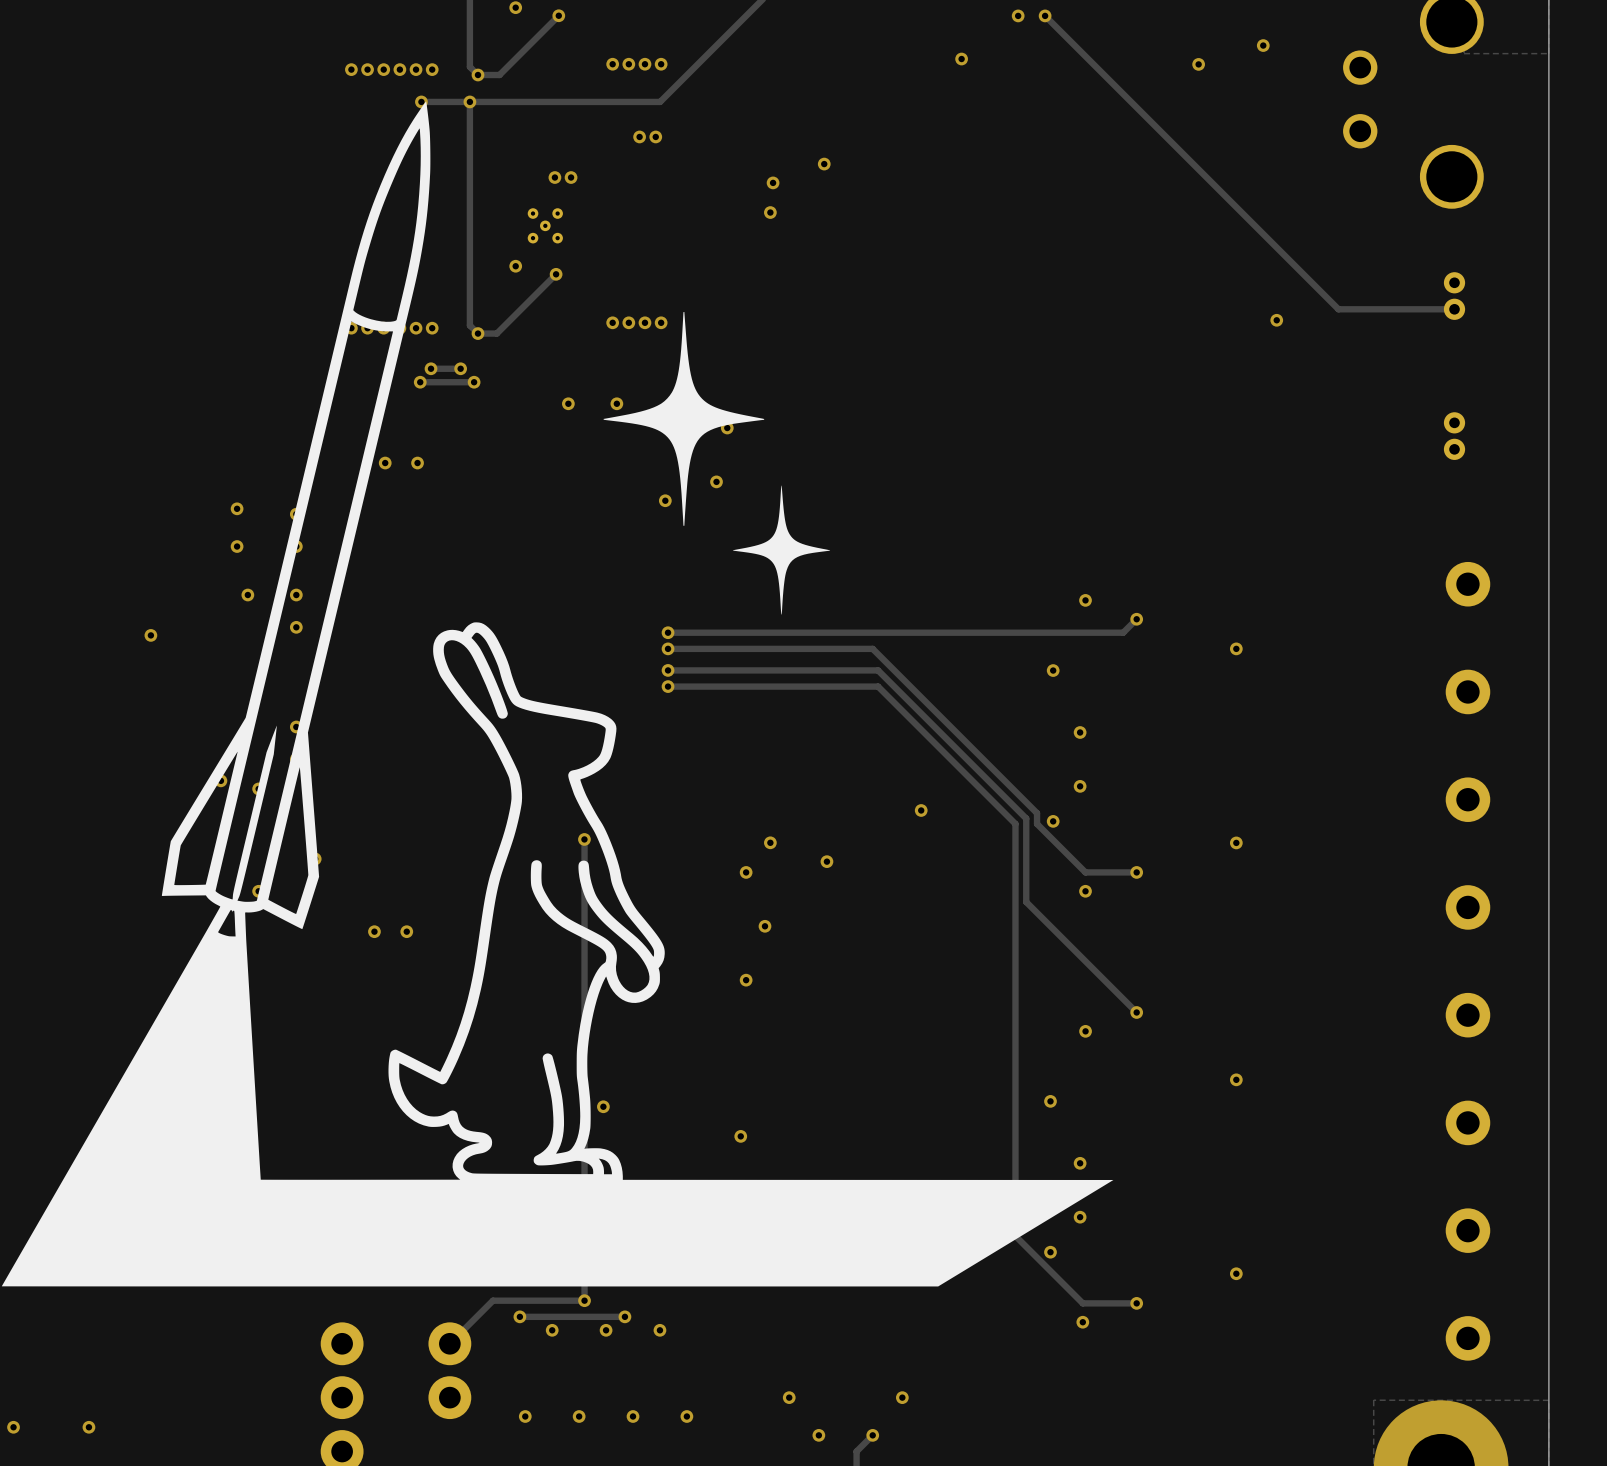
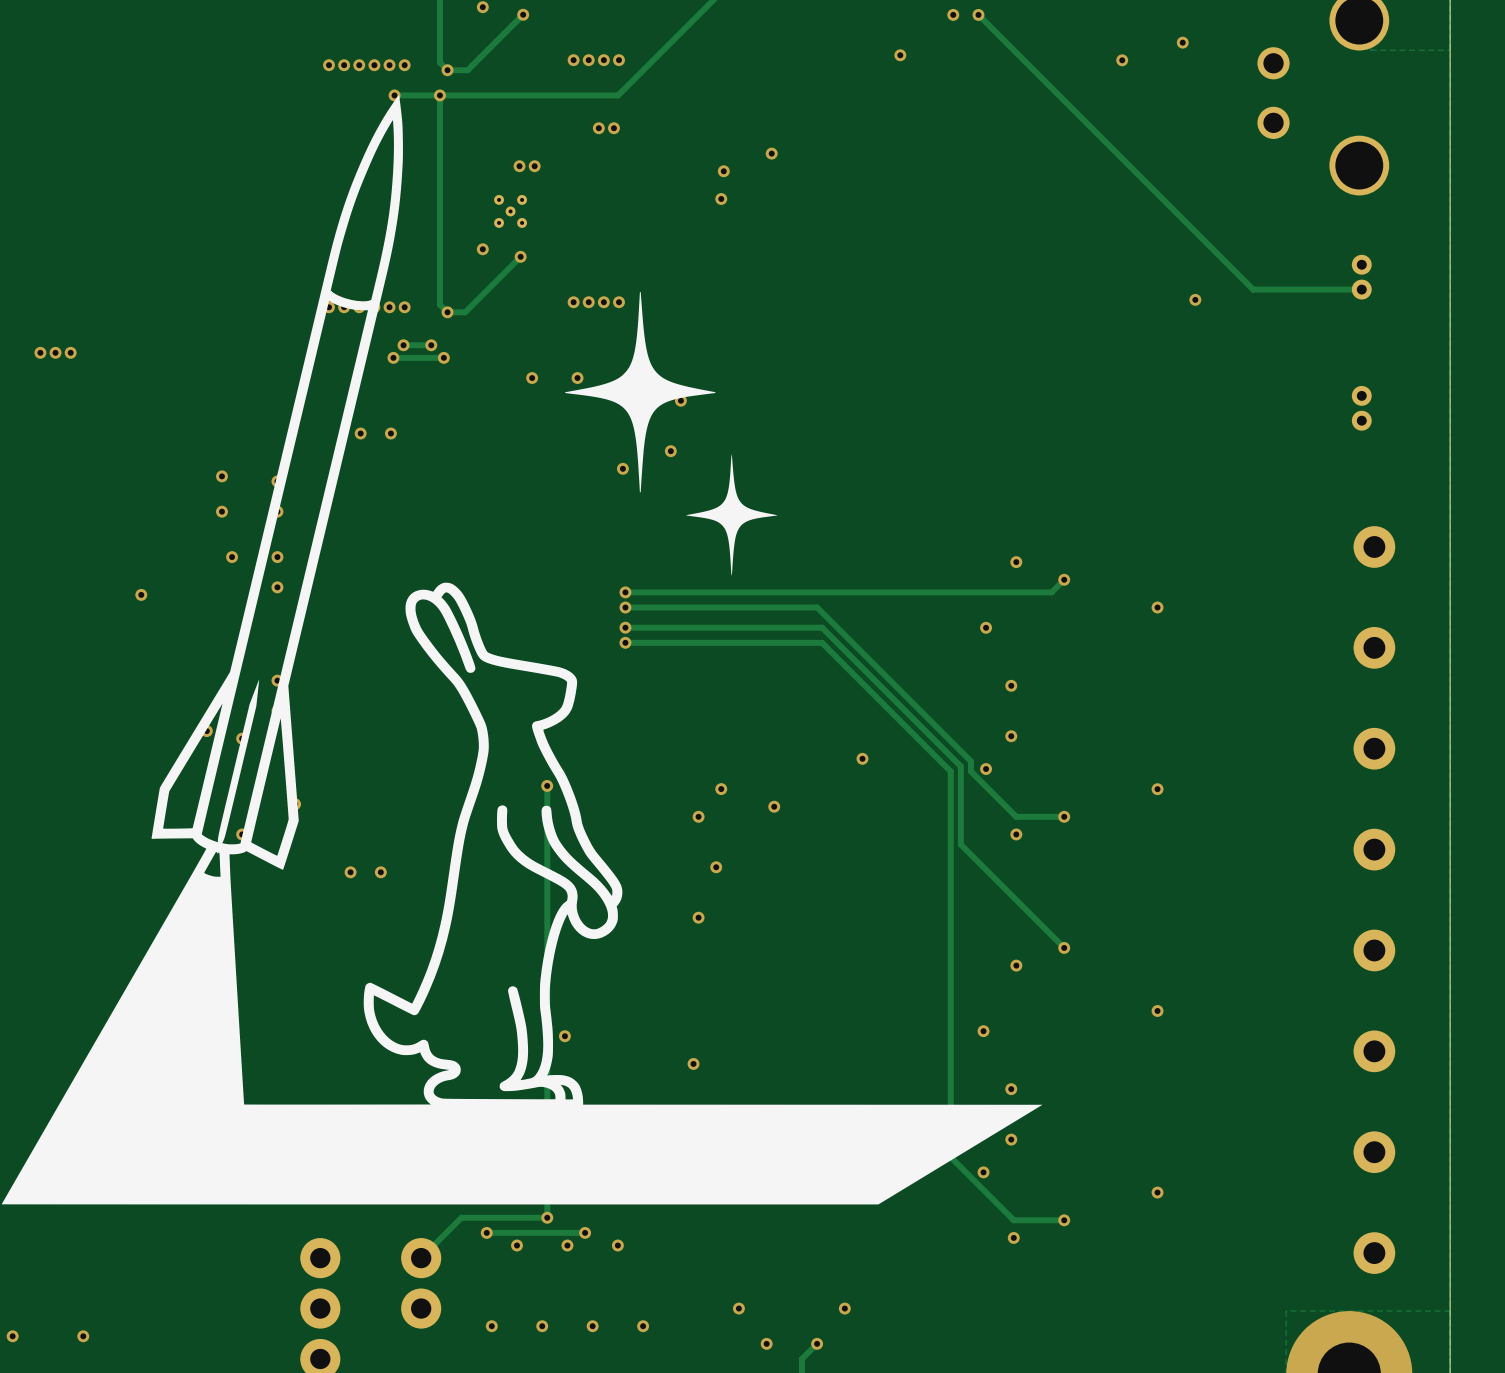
via: none -> (40, 352)
via: none -> (55, 352)
via: none -> (70, 352)

